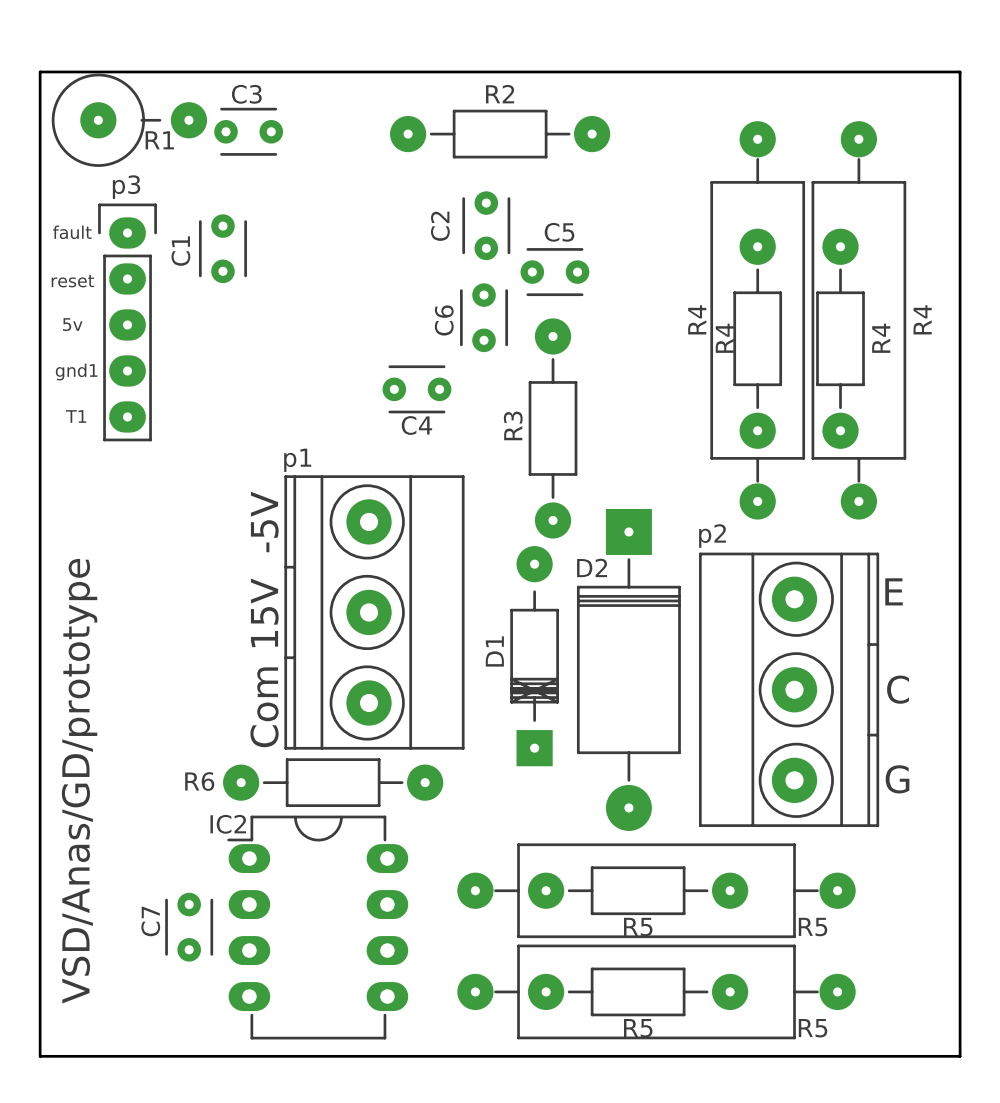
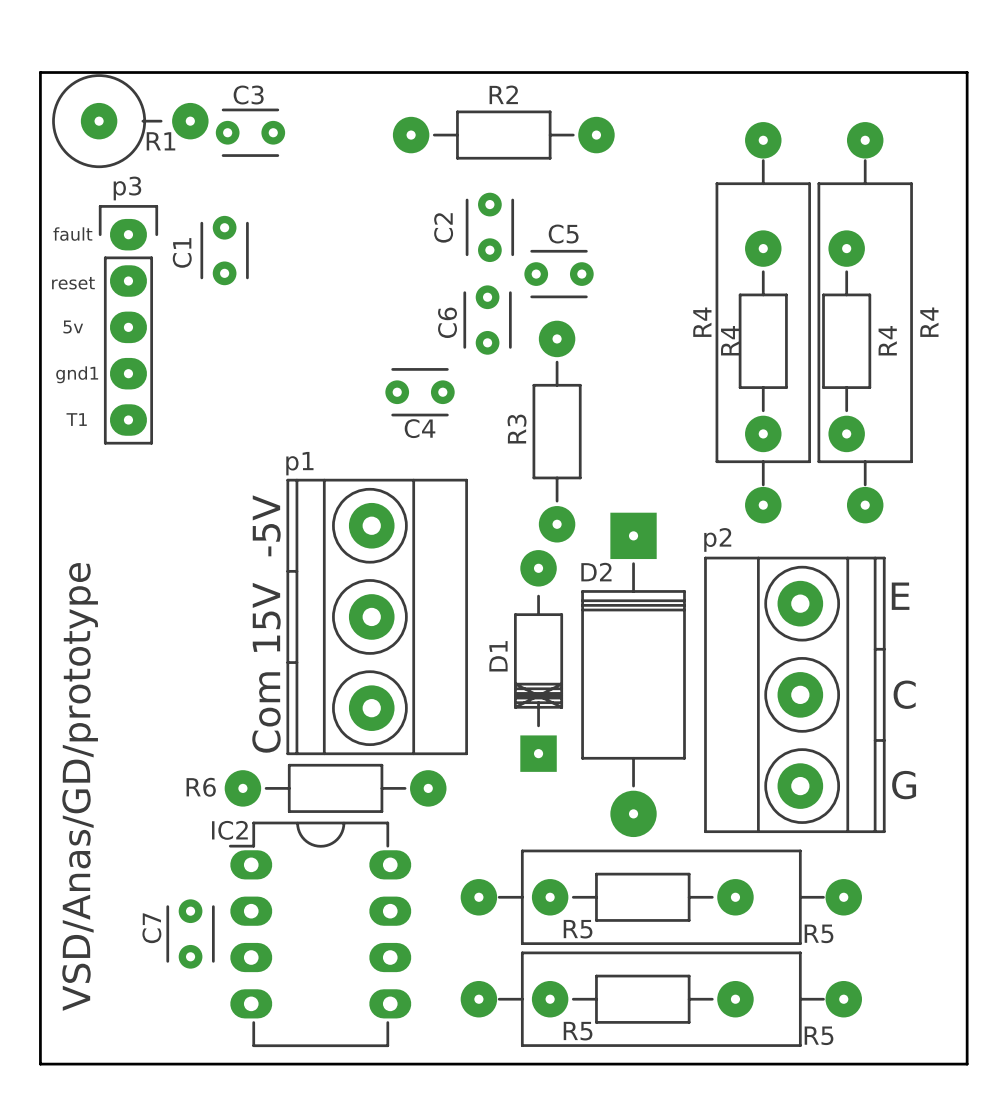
R5 name position: R5 (638, 927) -> R5 (578, 929)
R5 name position: R5 (638, 1028) -> R5 (578, 1031)

